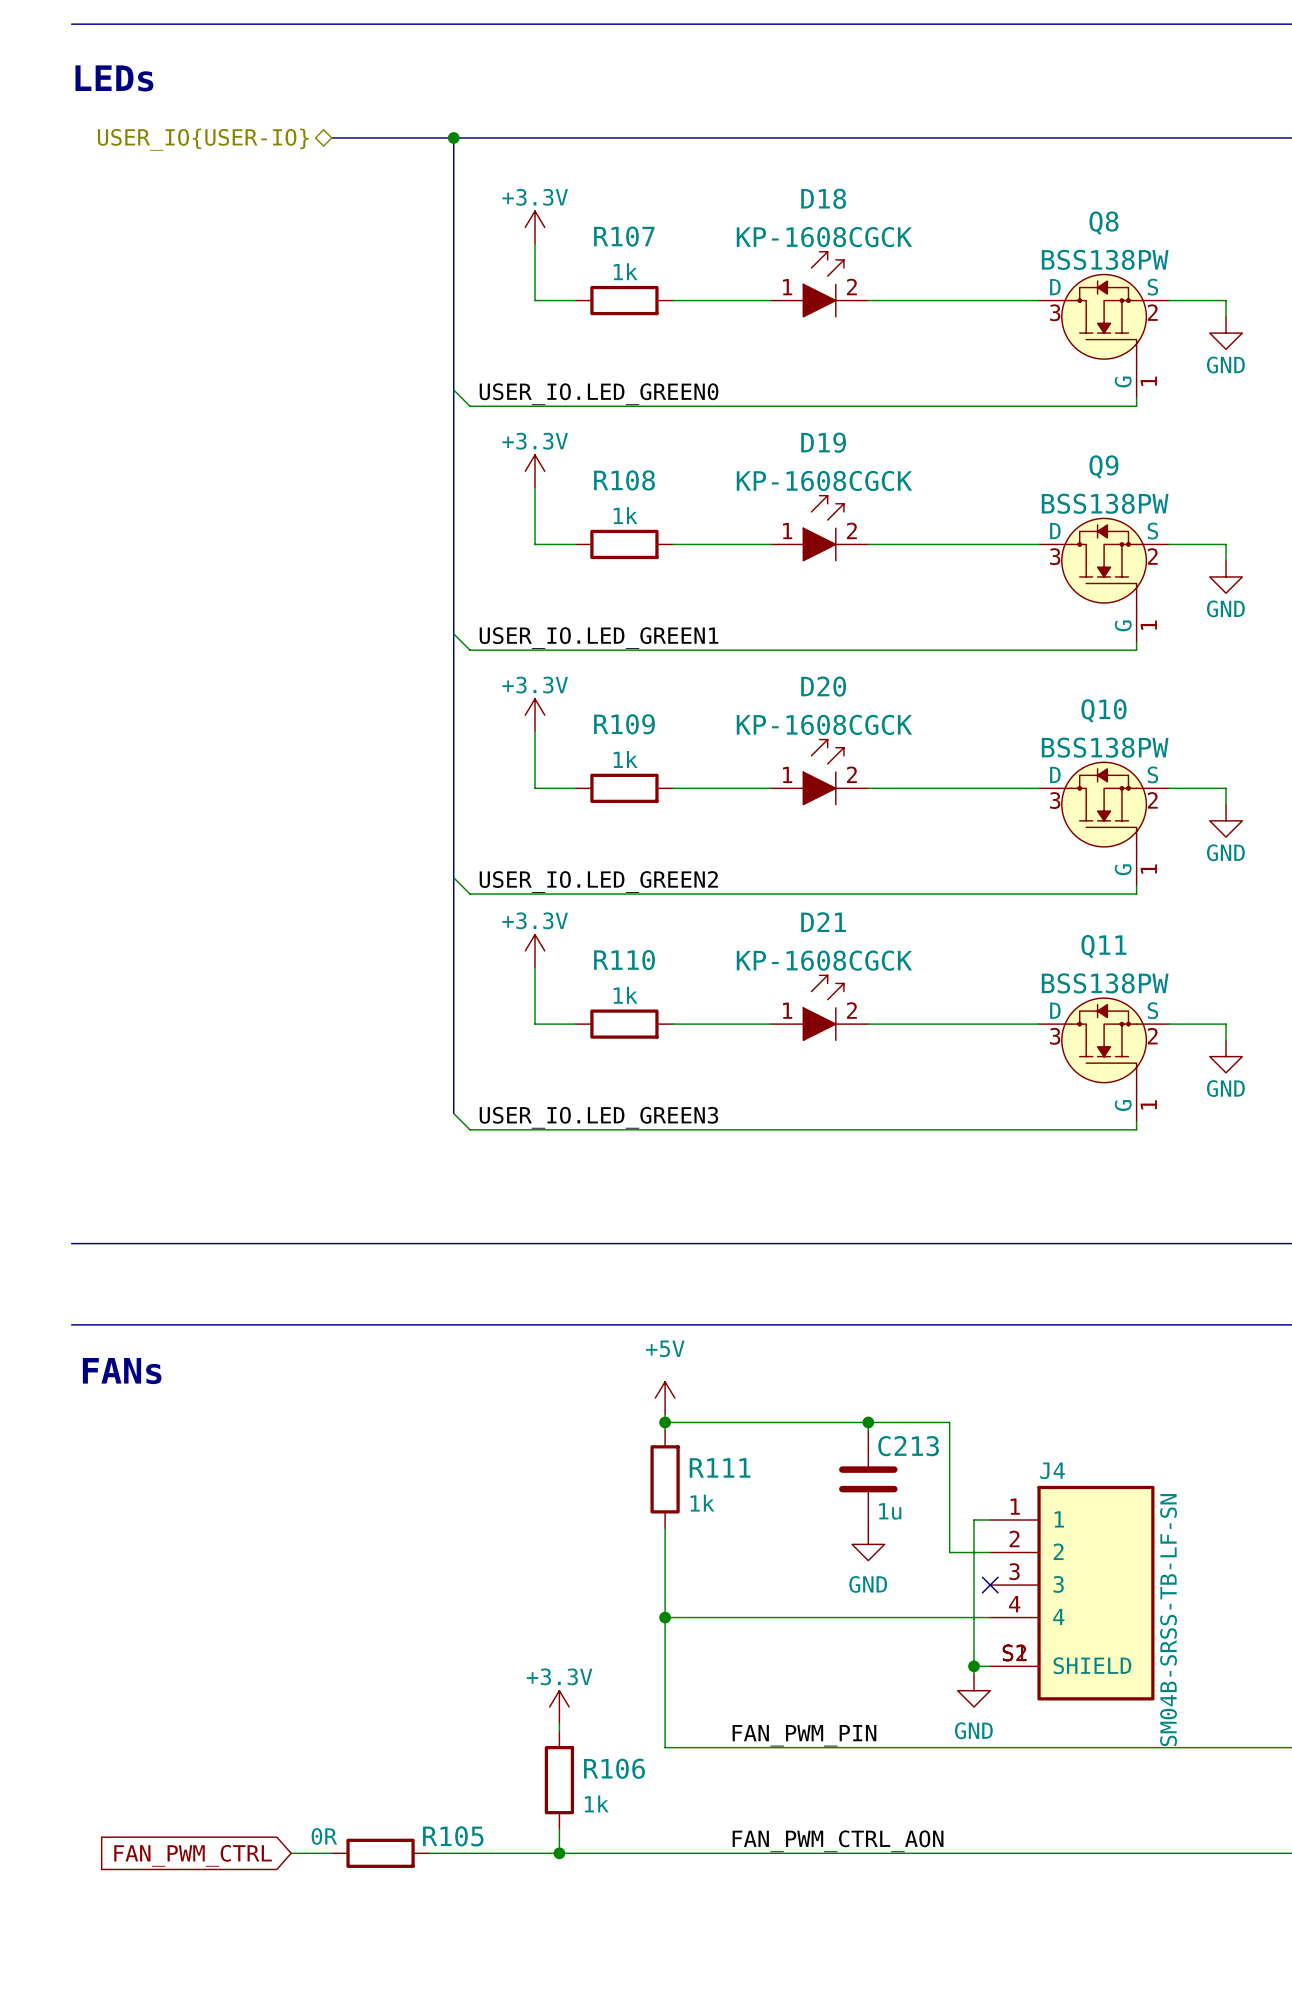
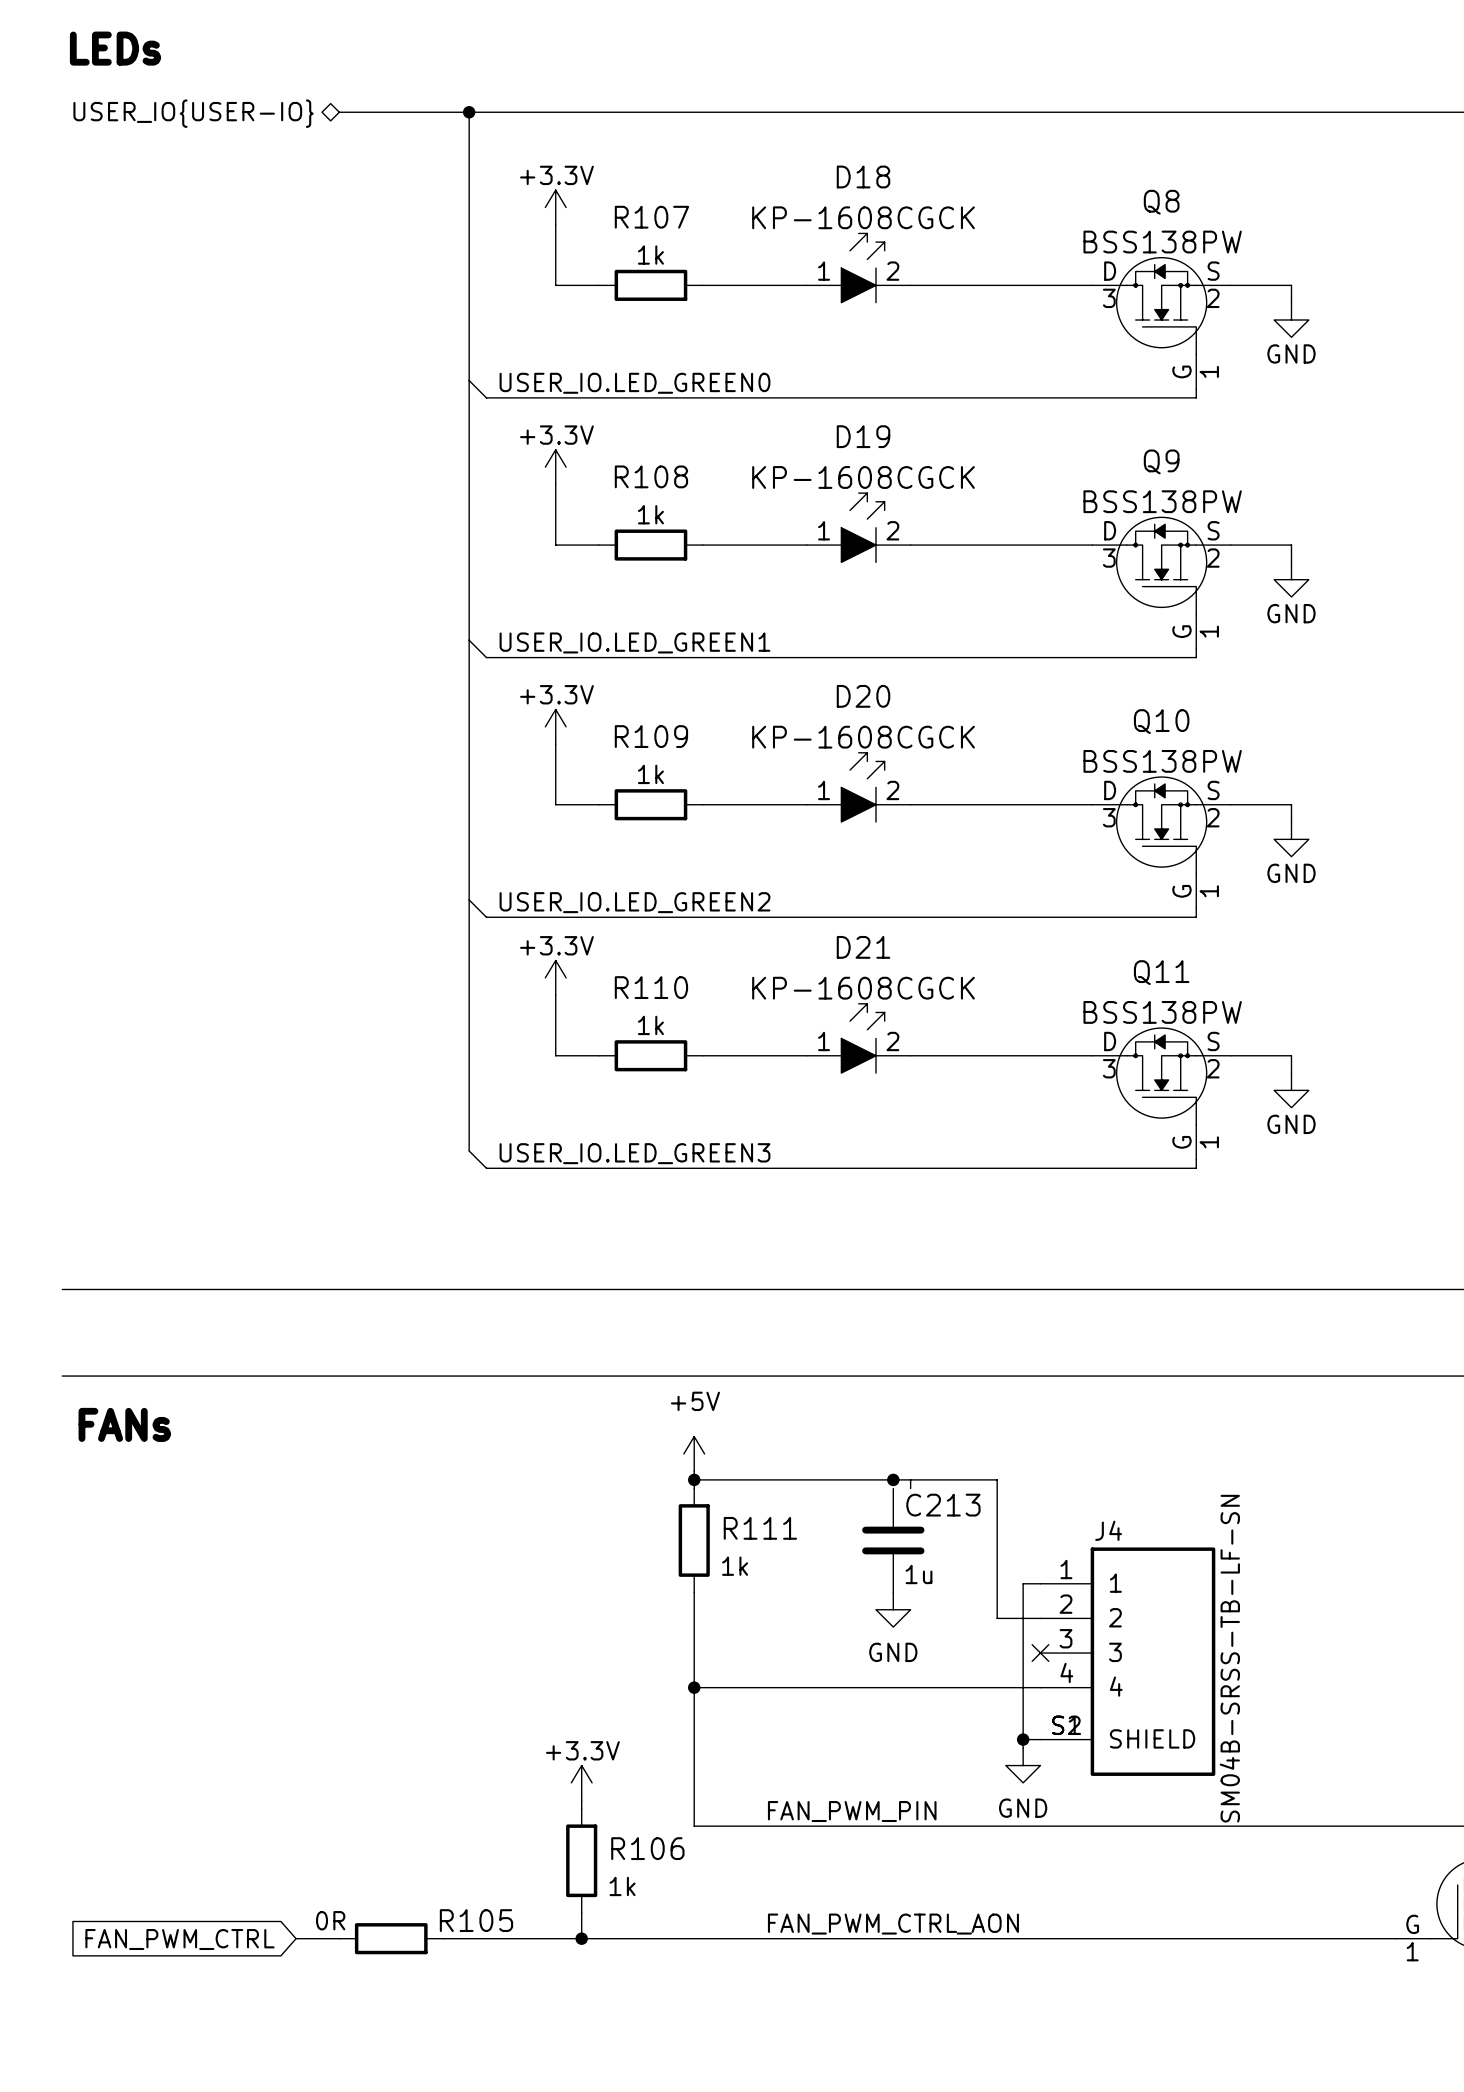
junction position: (868, 1422) -> (893, 1479)
C213 position: (868, 1479) -> (893, 1540)
power symbol position: GND (868, 1544) -> GND (893, 1609)

